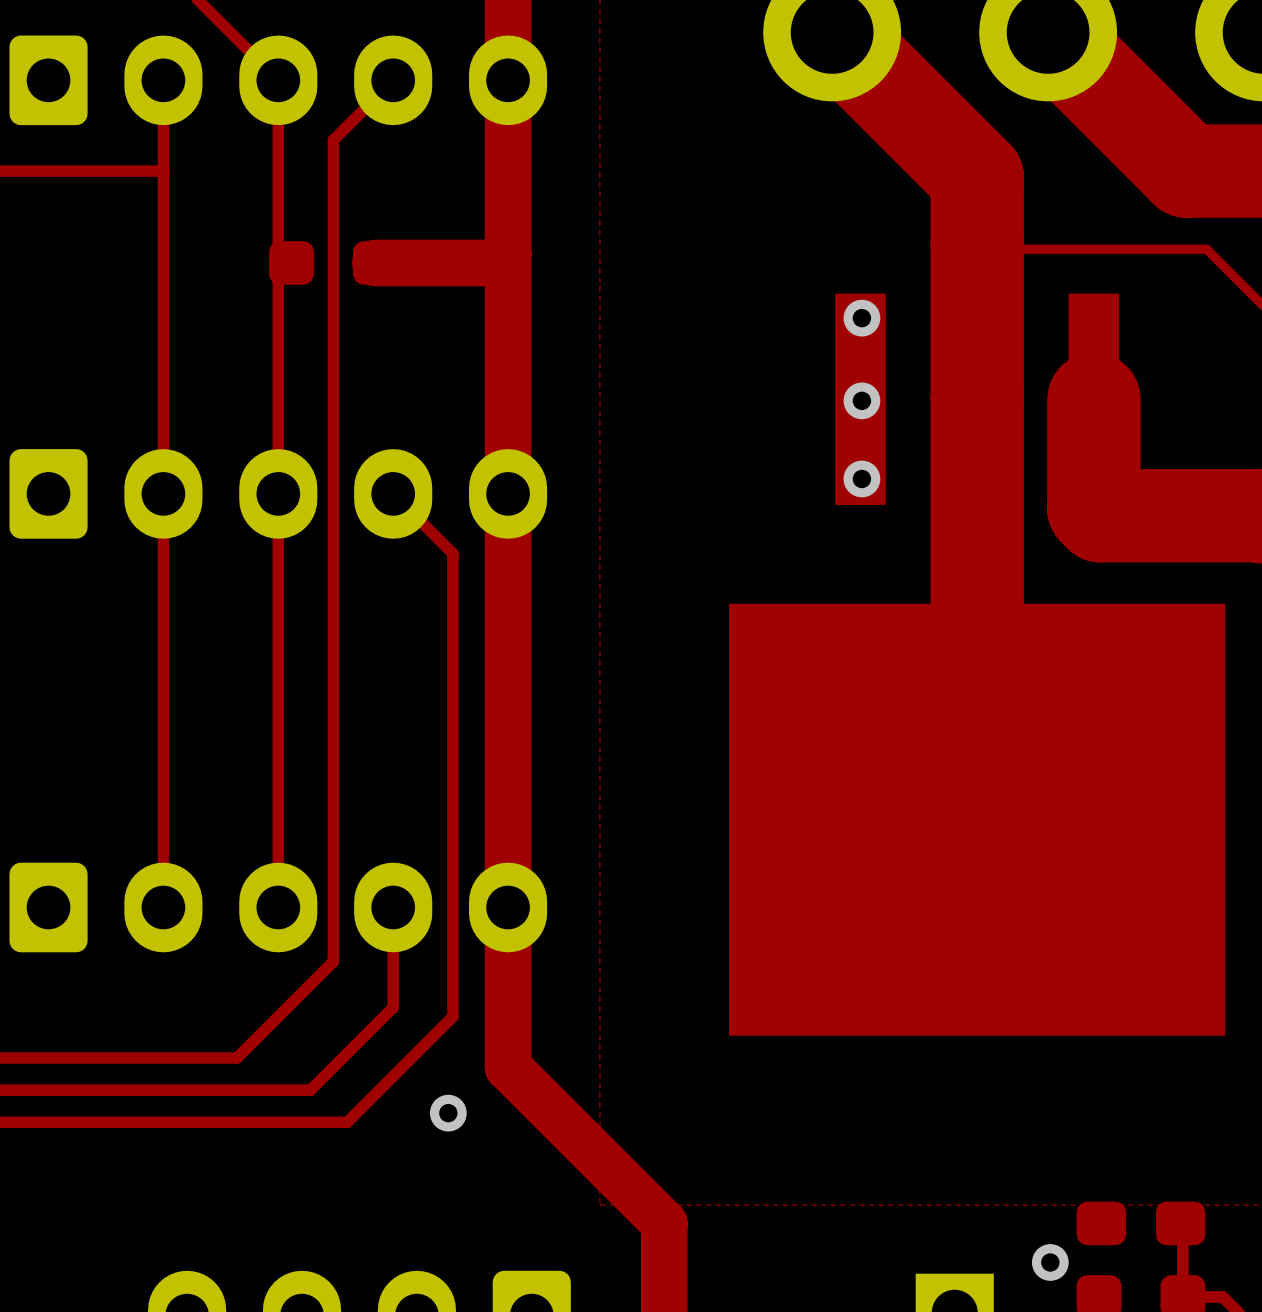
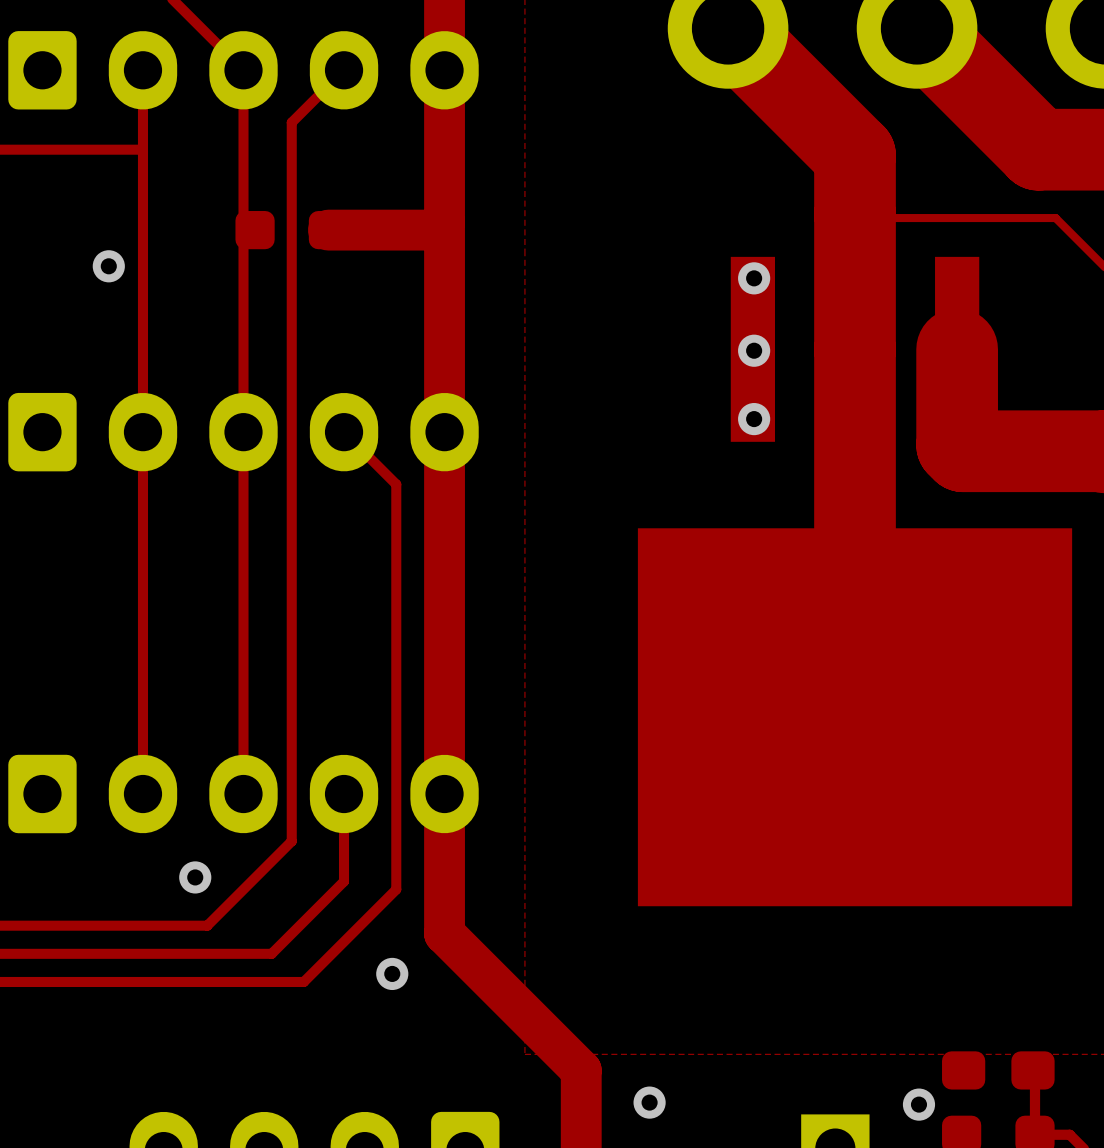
via: none -> (108, 266)
via: none -> (195, 877)
via: none -> (649, 1102)

